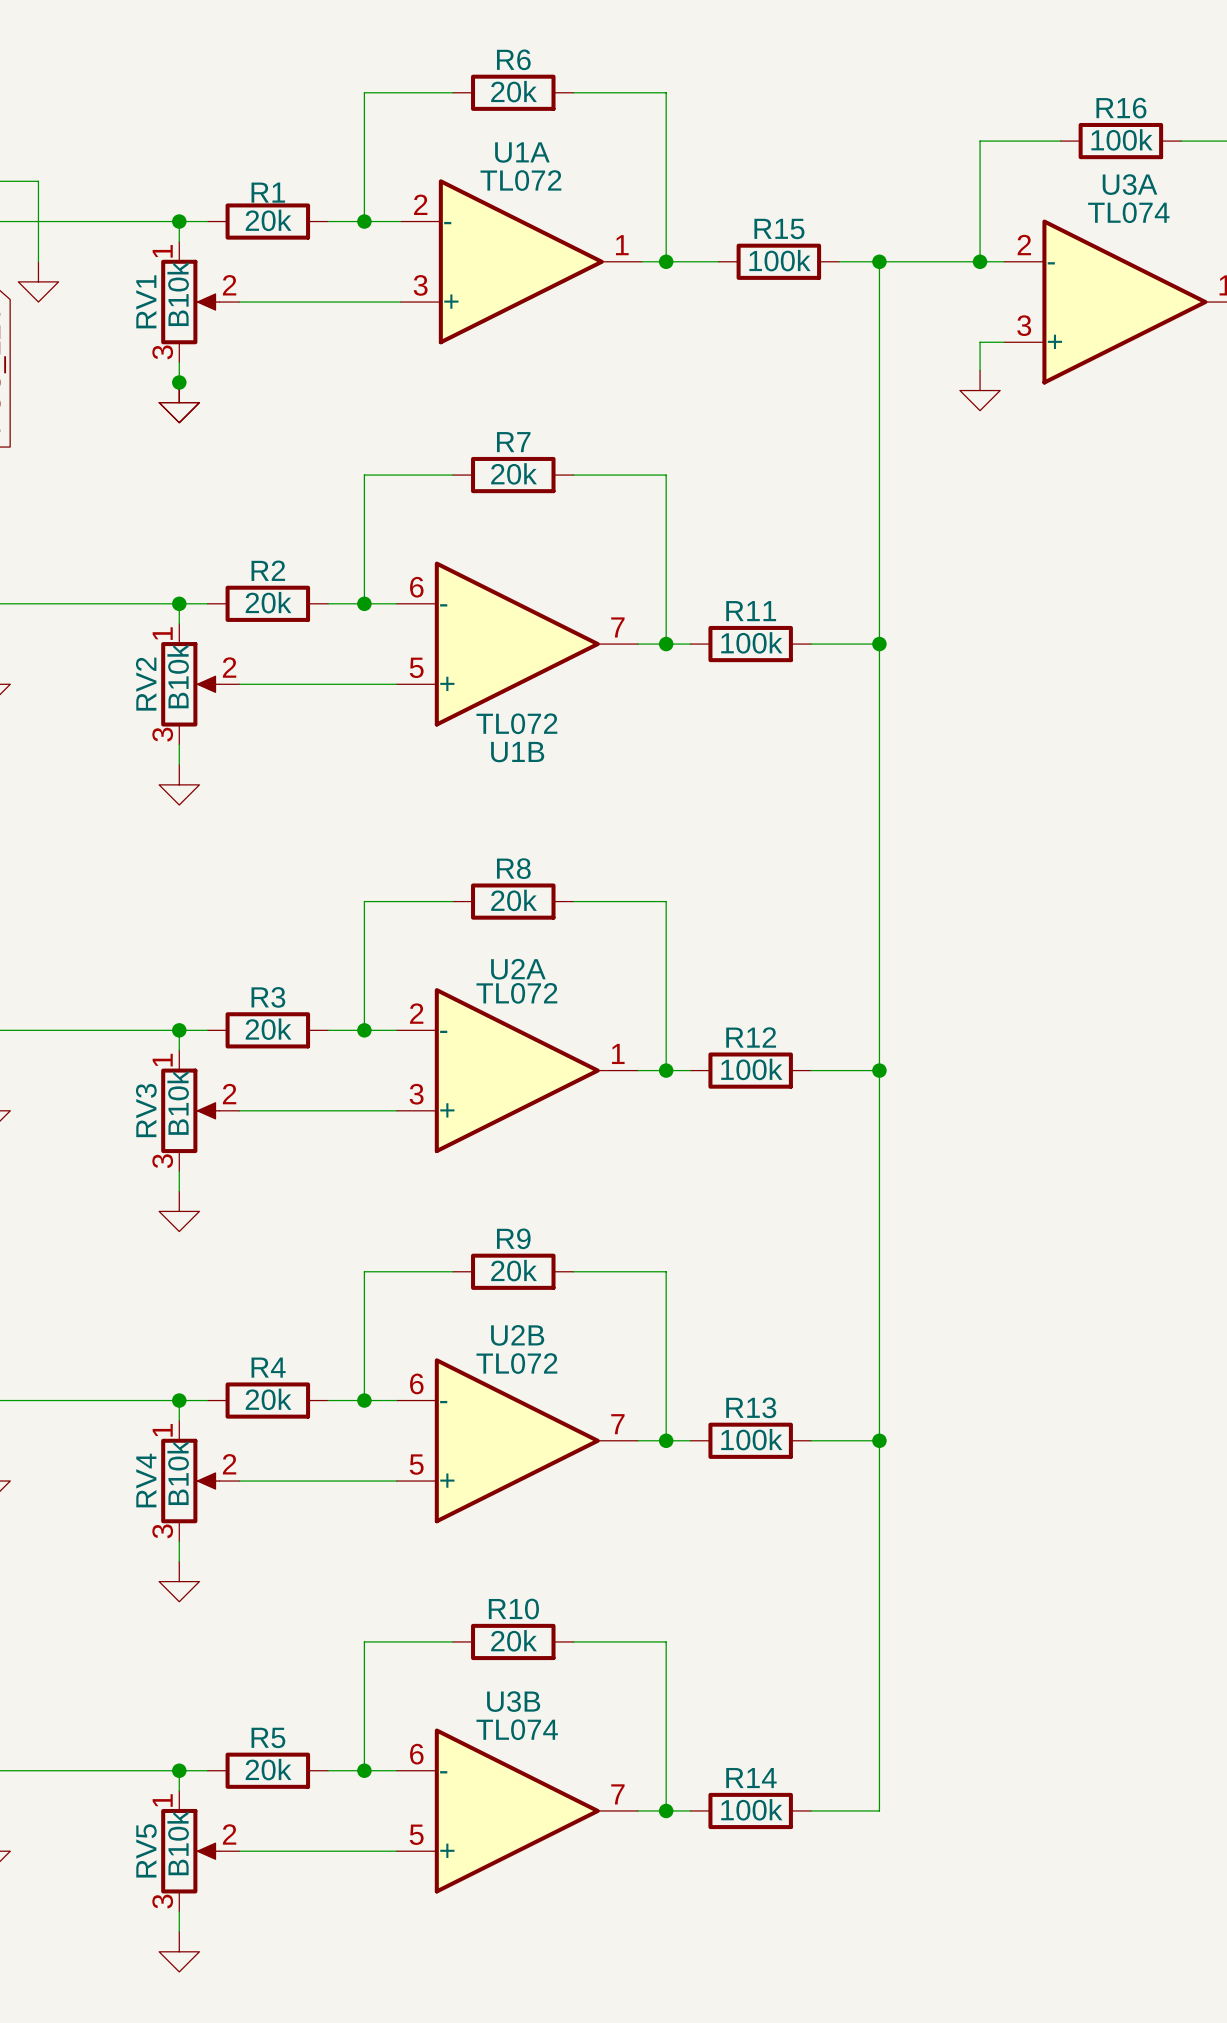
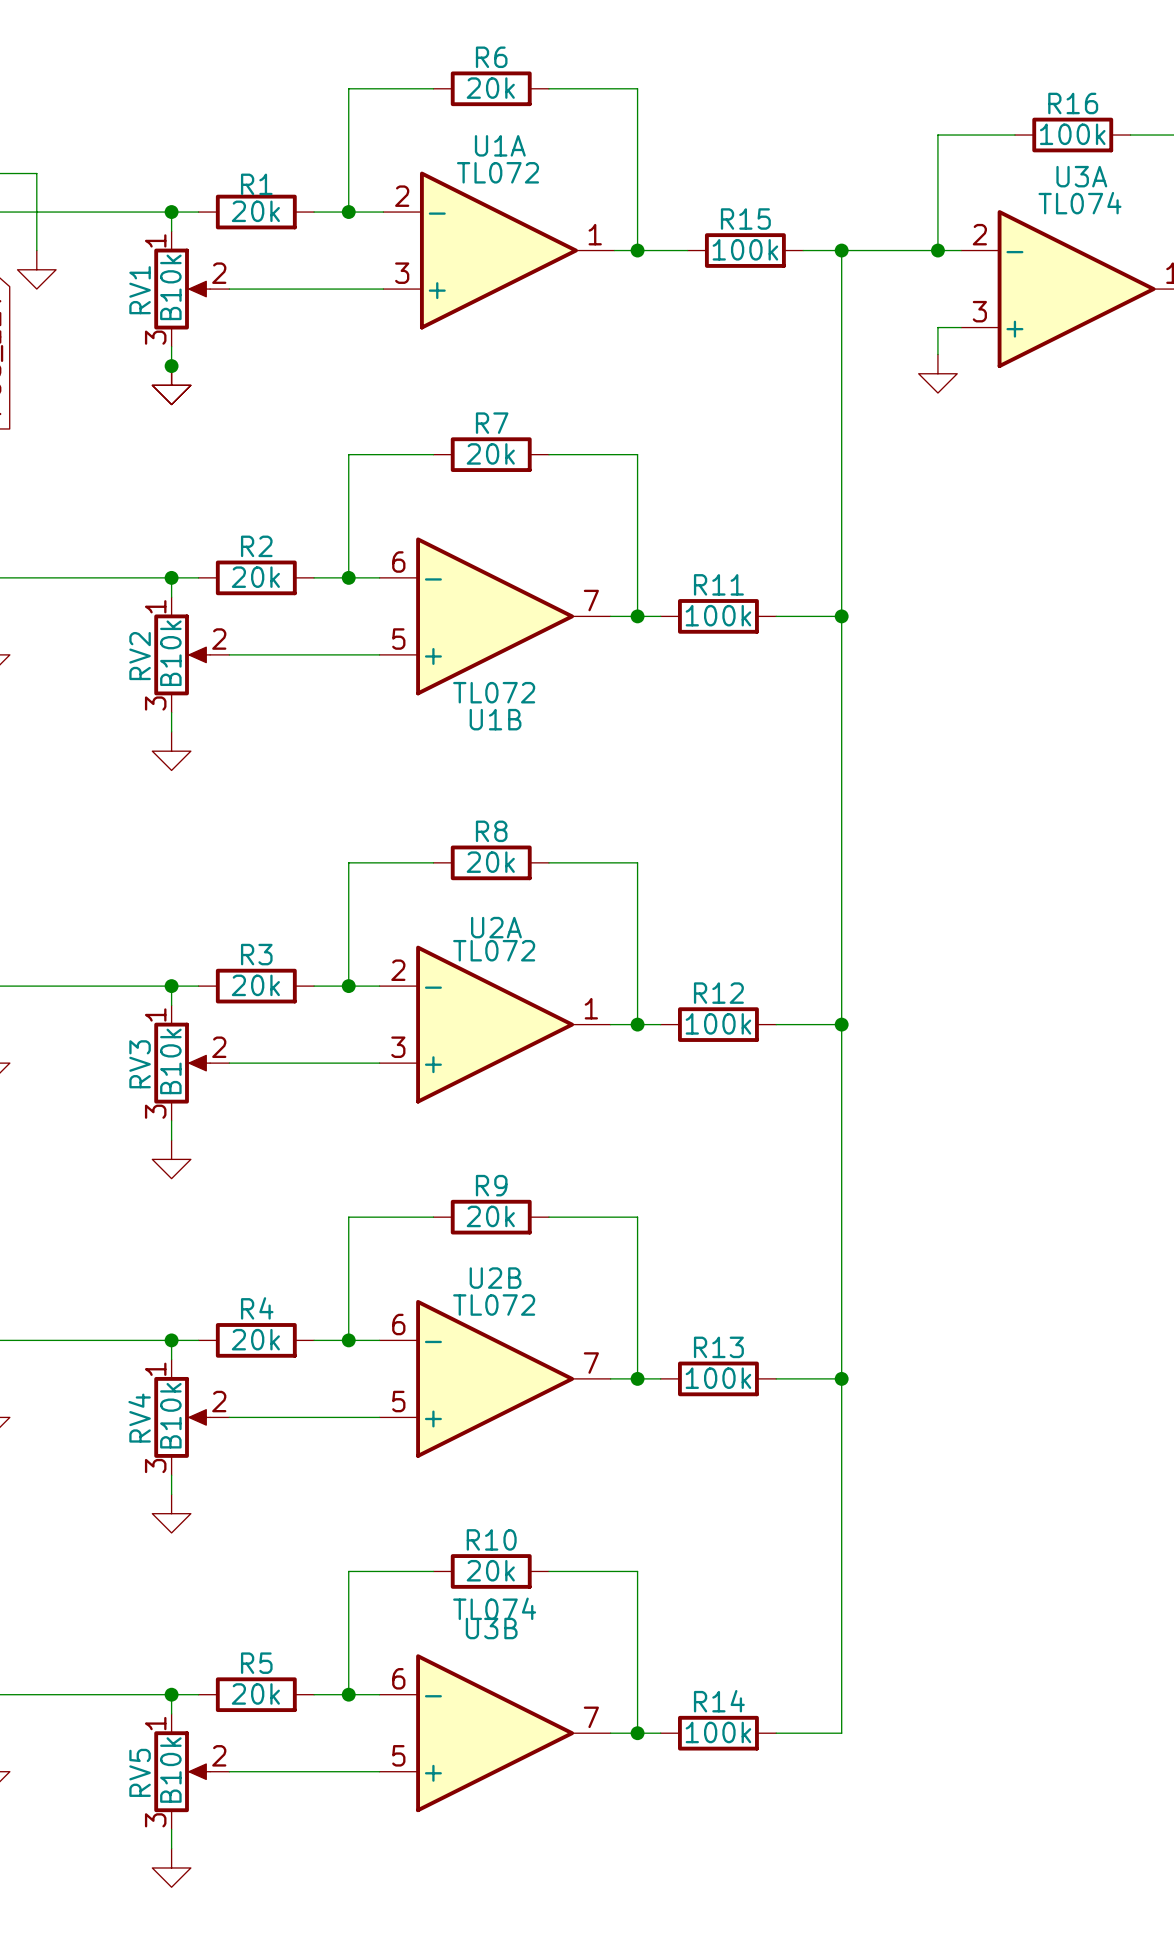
U3B value position: TL074 (517, 1729) -> TL074 (494, 1608)

